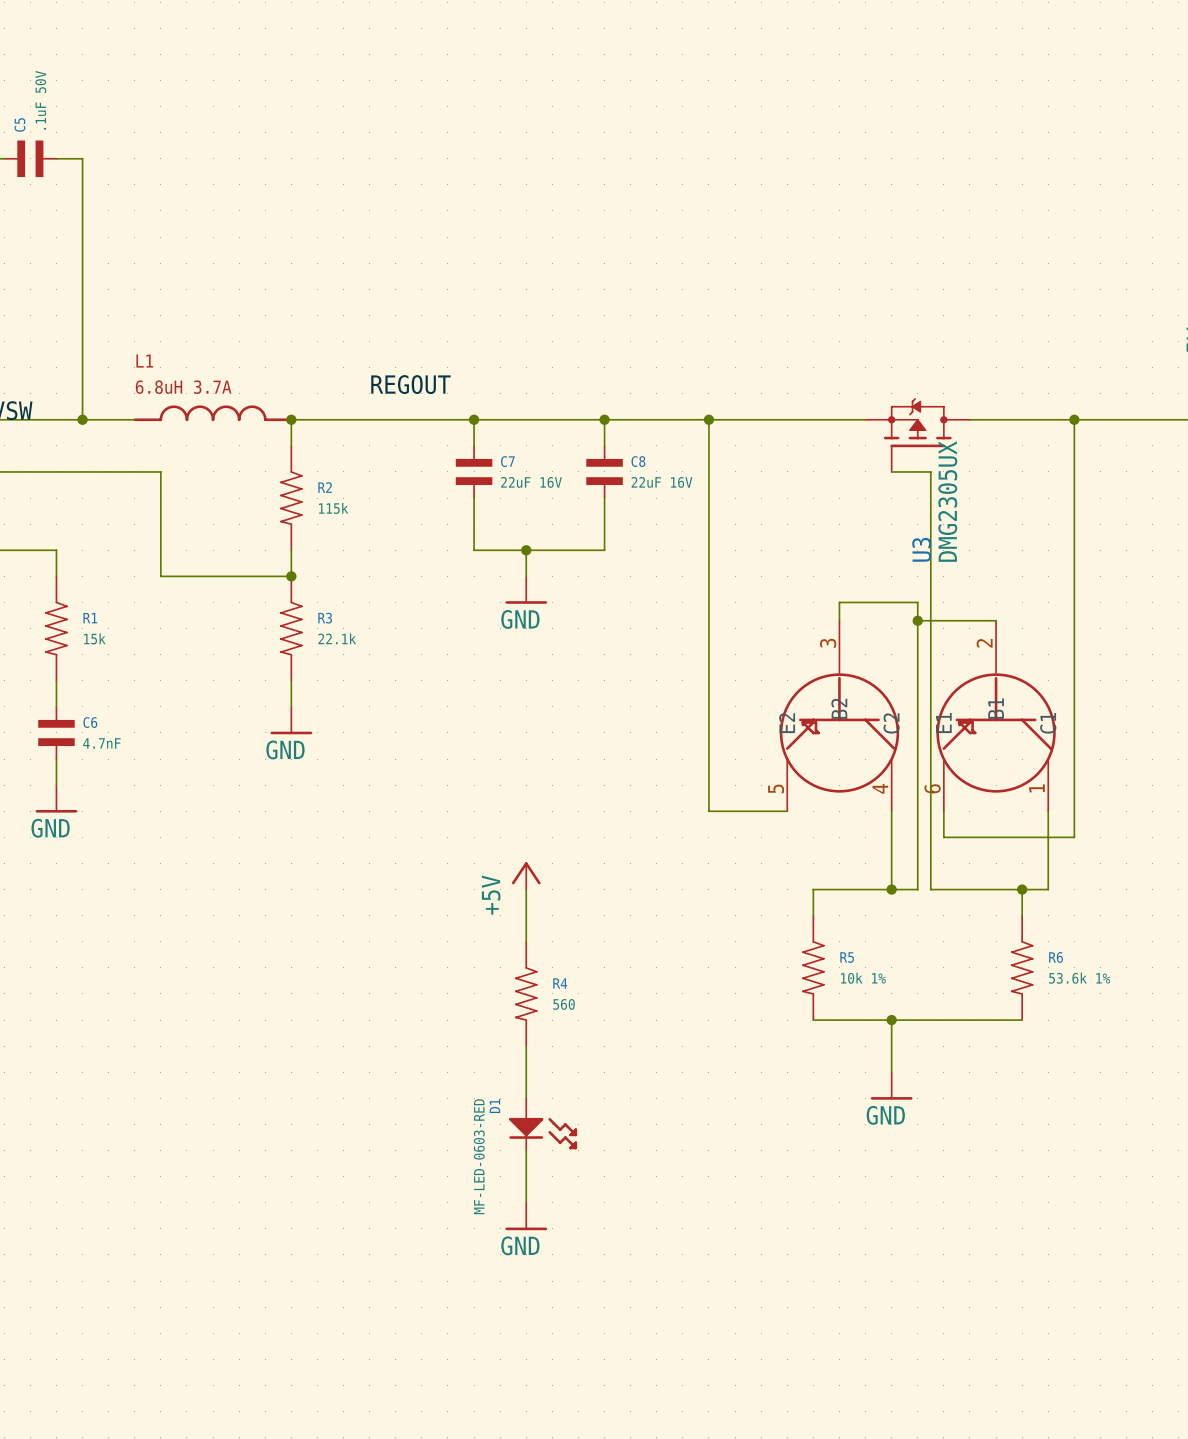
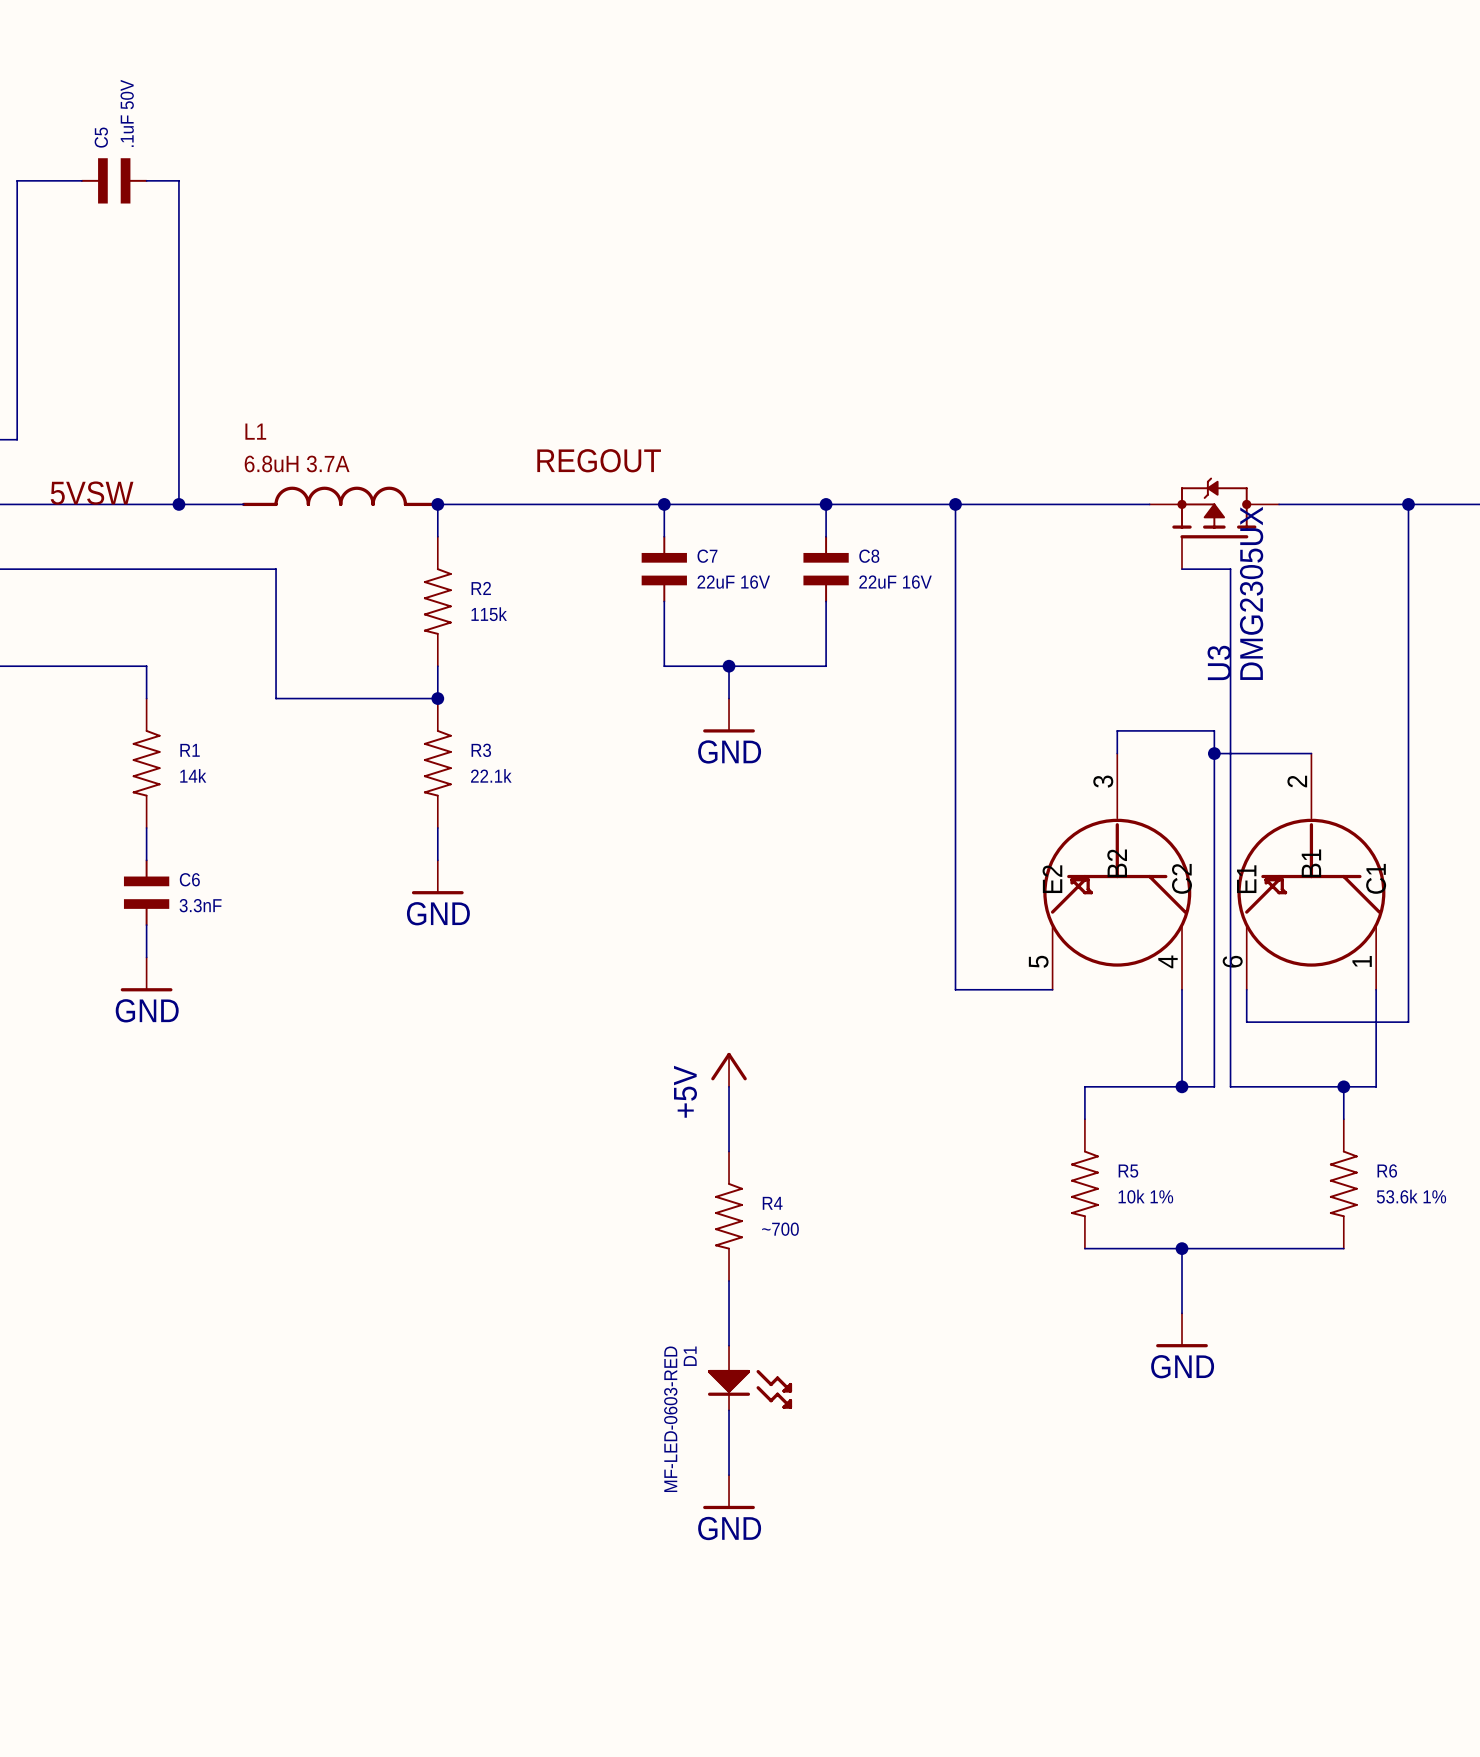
R1 value: 15k (94, 638) -> 14k (193, 775)
C6 value: 4.7nF (101, 743) -> 3.3nF (200, 905)
R4 value: 560 (564, 1004) -> ~700 (780, 1229)

